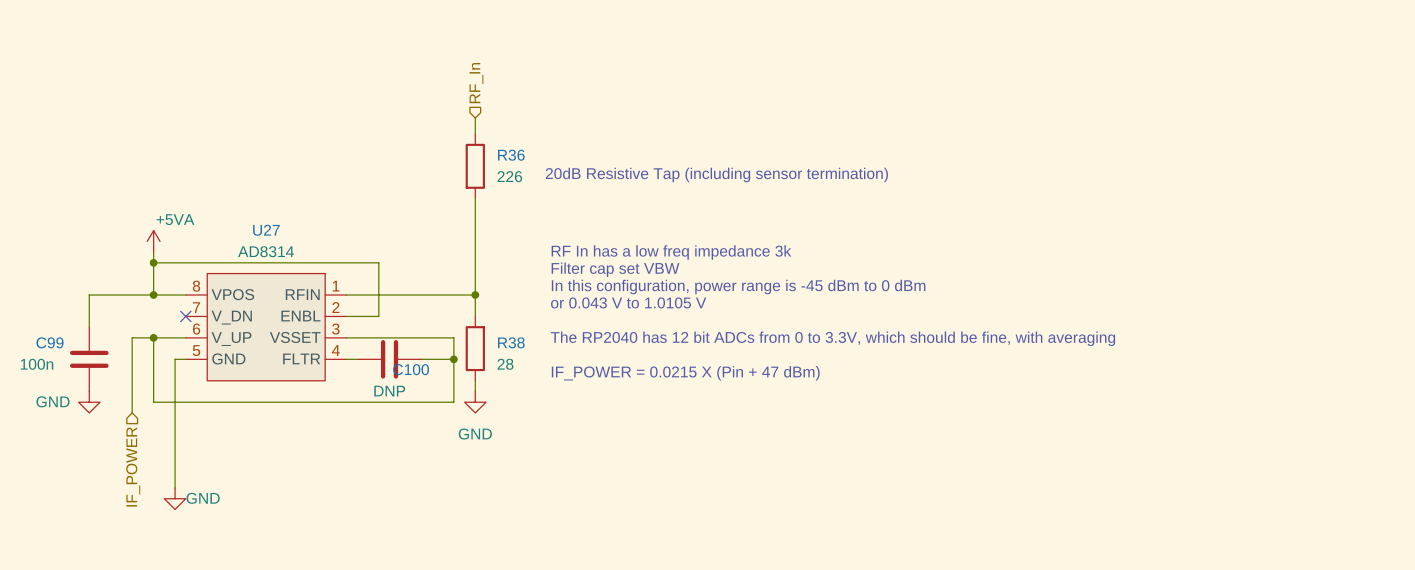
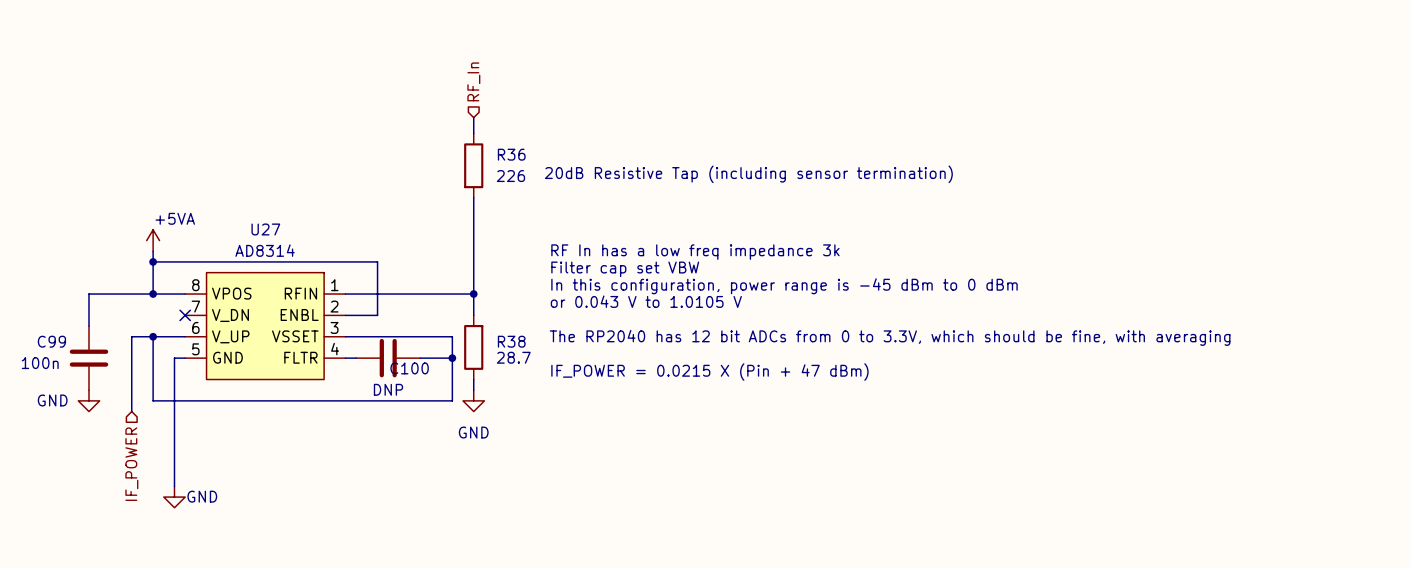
R38 value: 28 (505, 364) -> 28.7 (513, 357)

